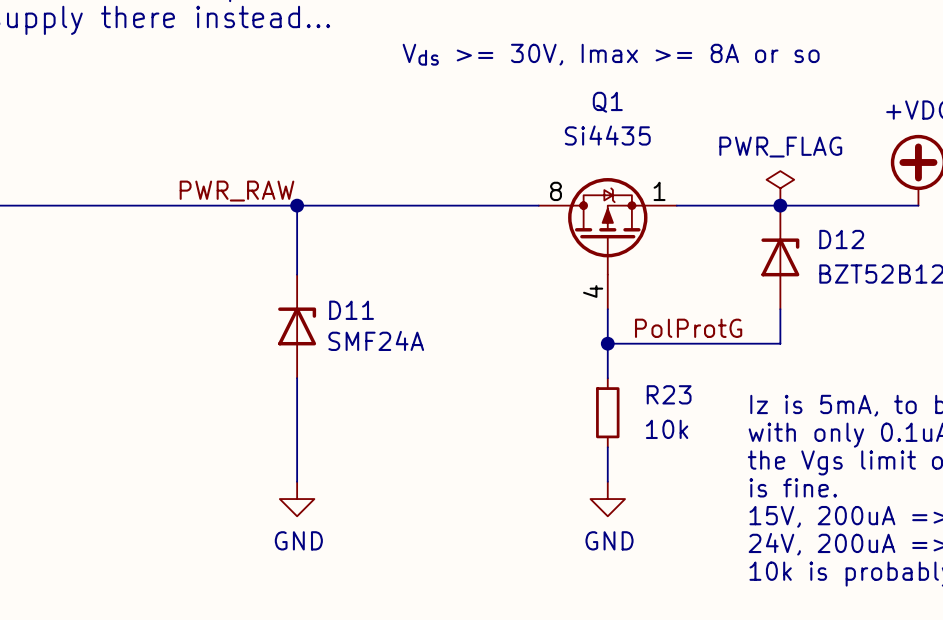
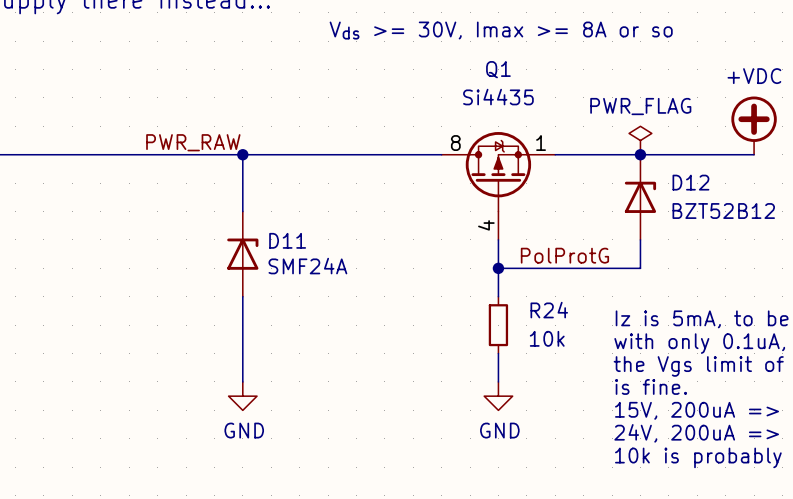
R23 name: R23 (669, 394) -> R24 (549, 310)

